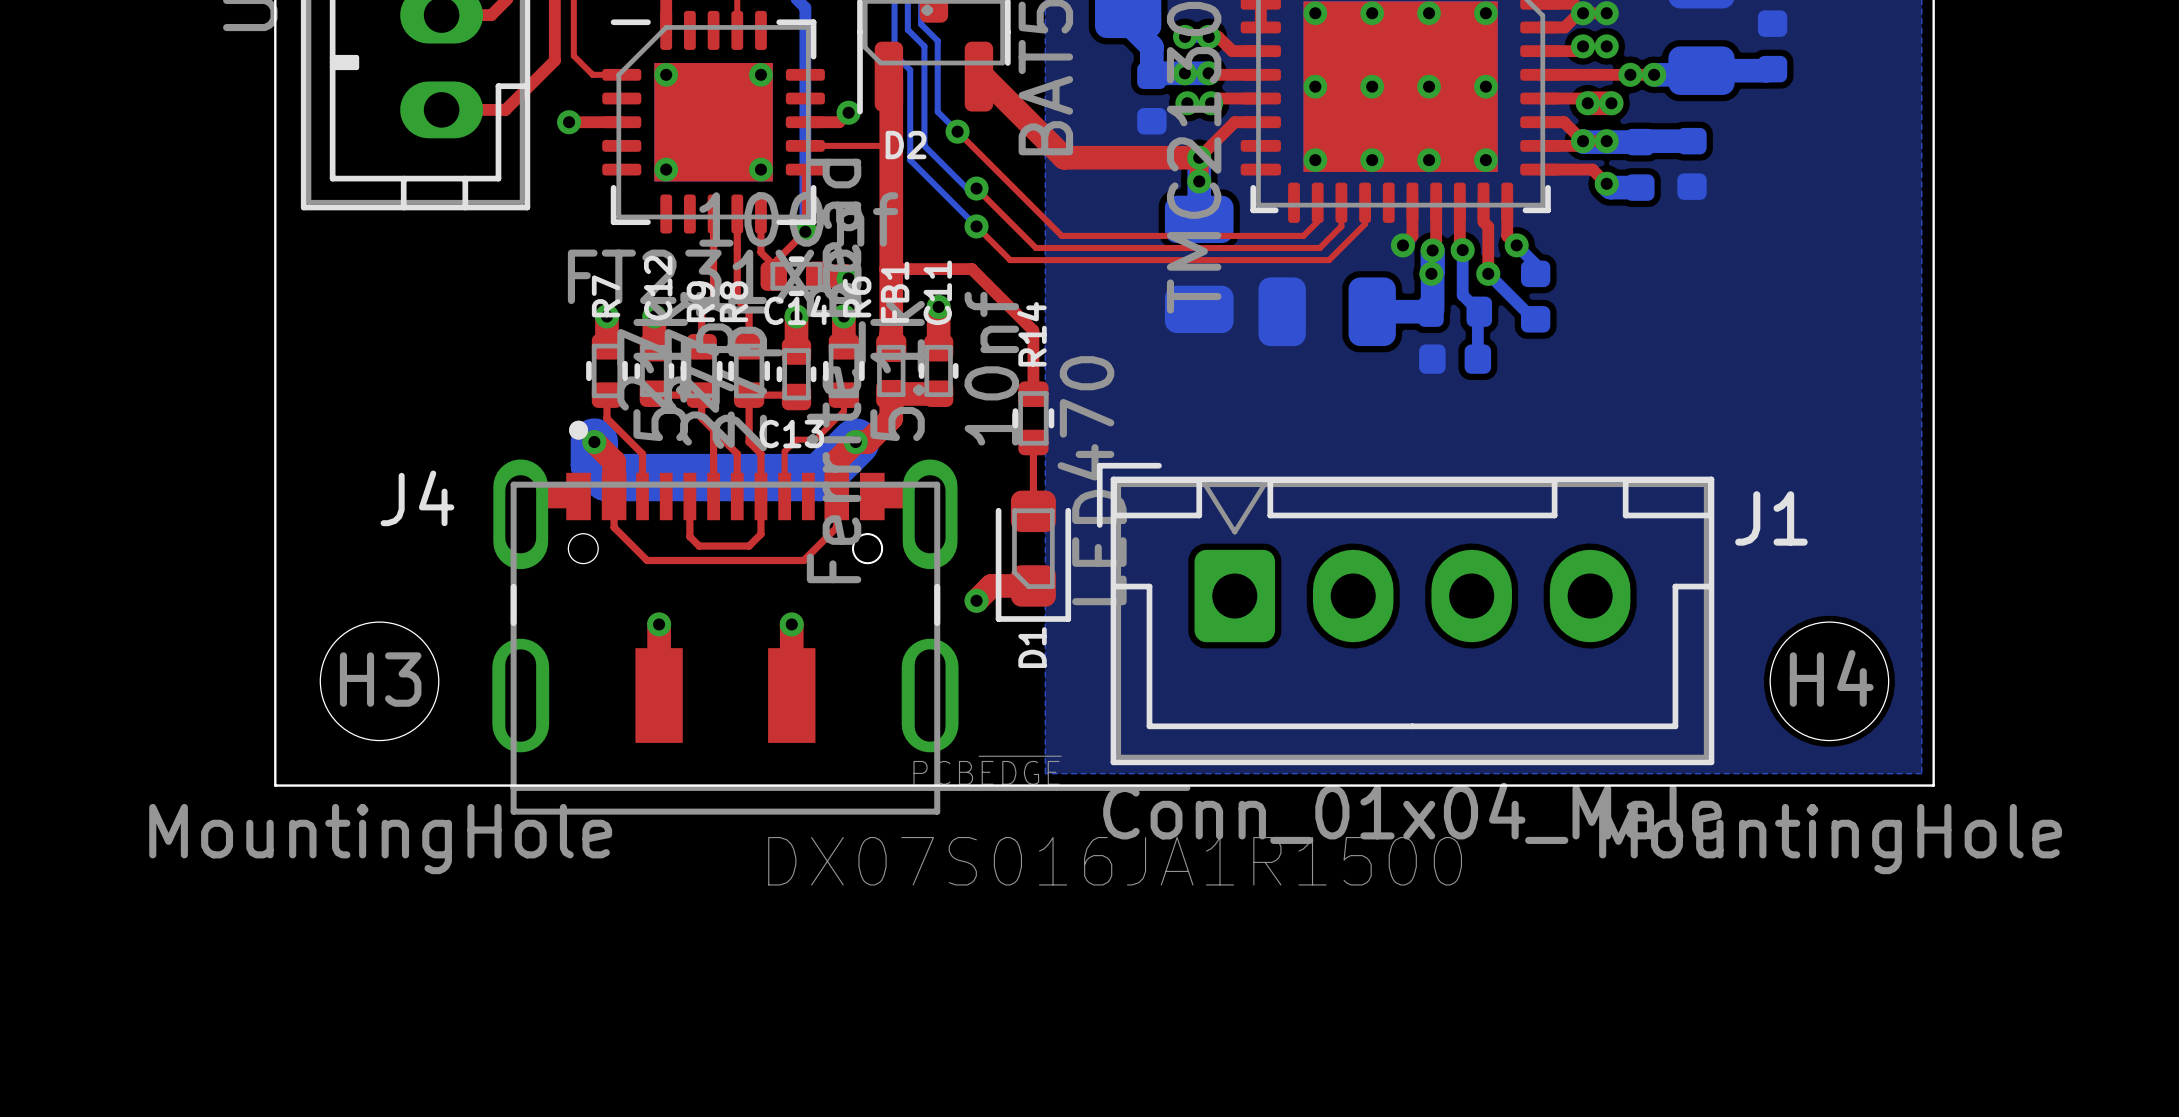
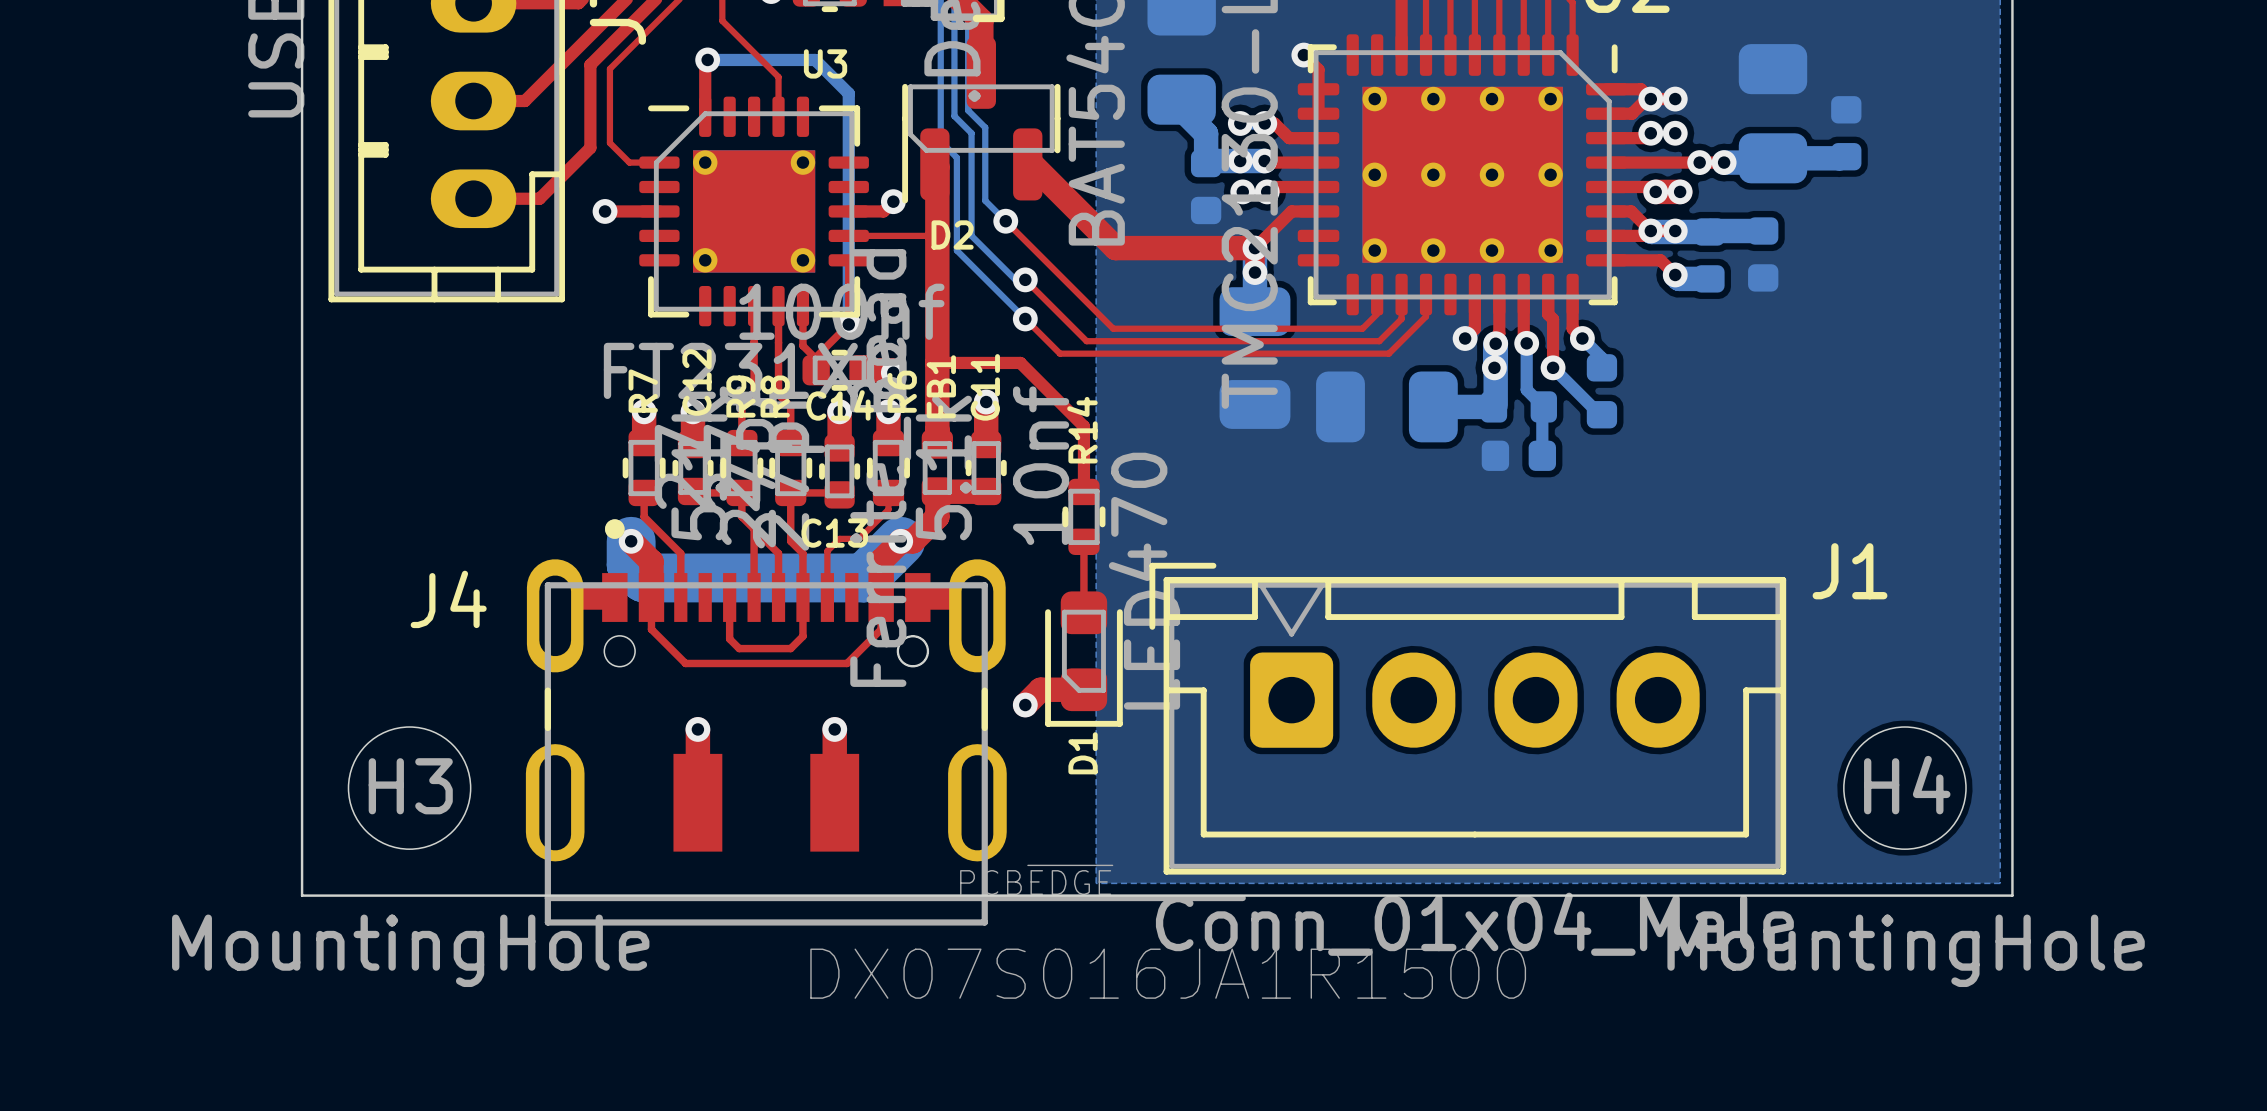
J1 name position: J1 (1771, 518) -> J1 (1850, 571)

